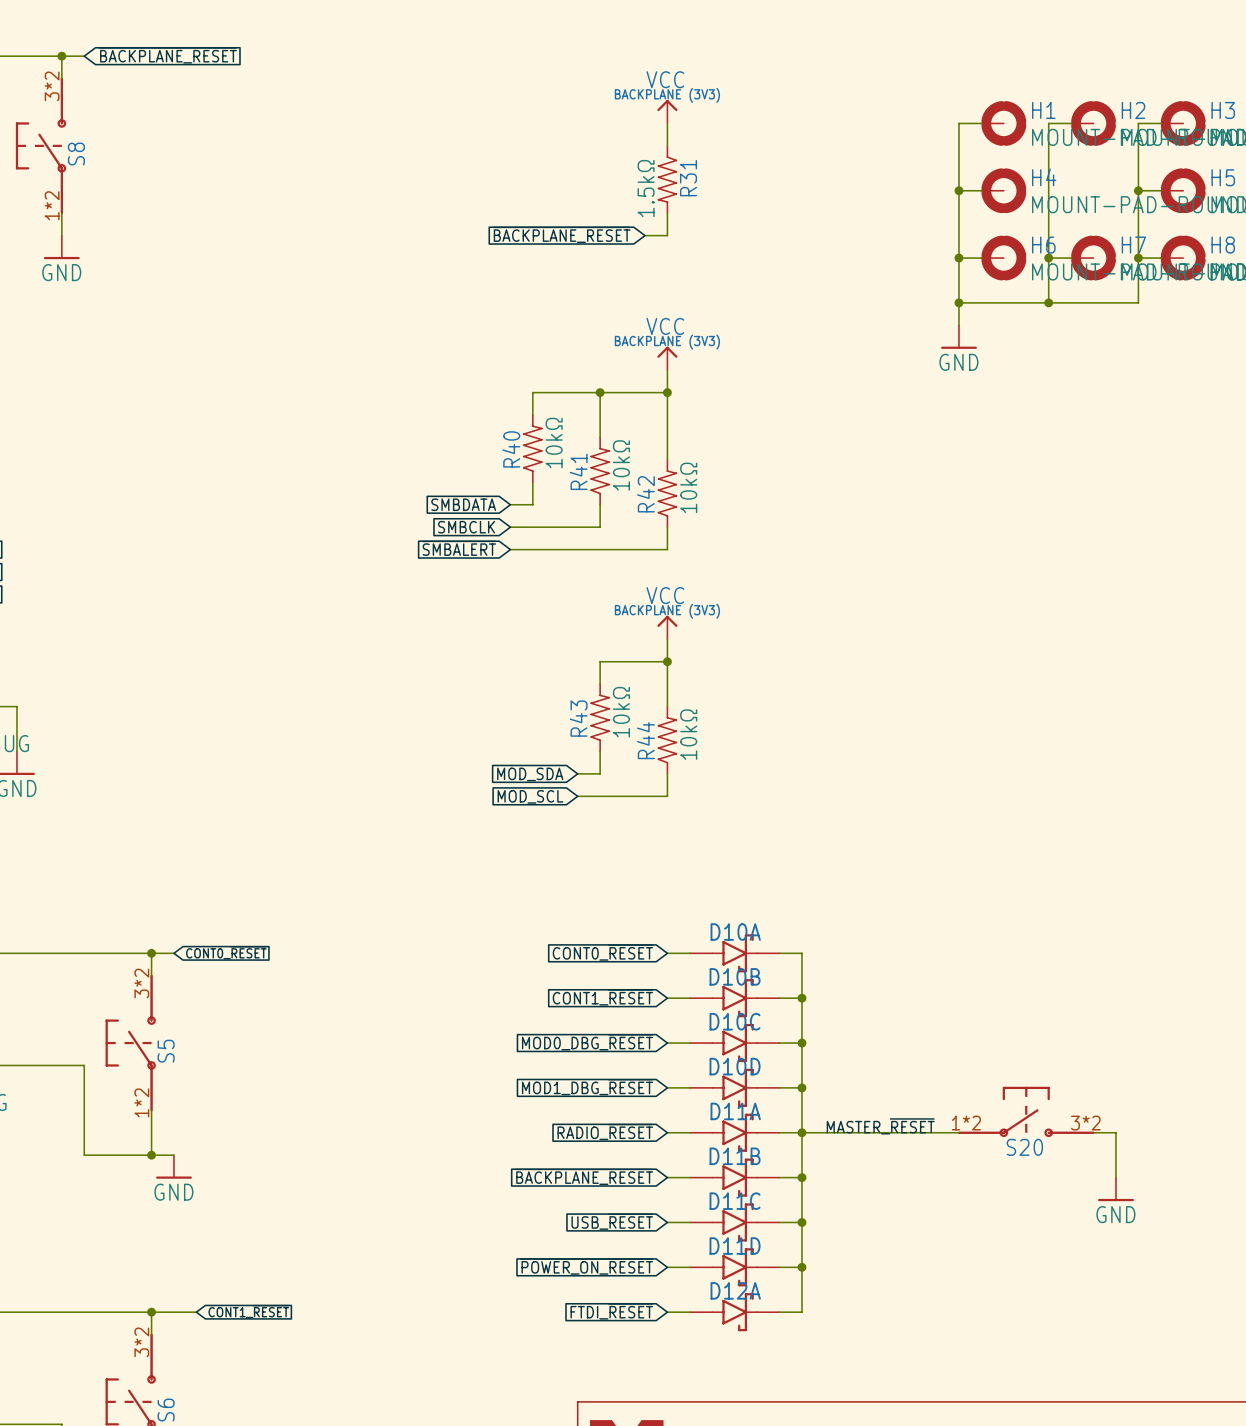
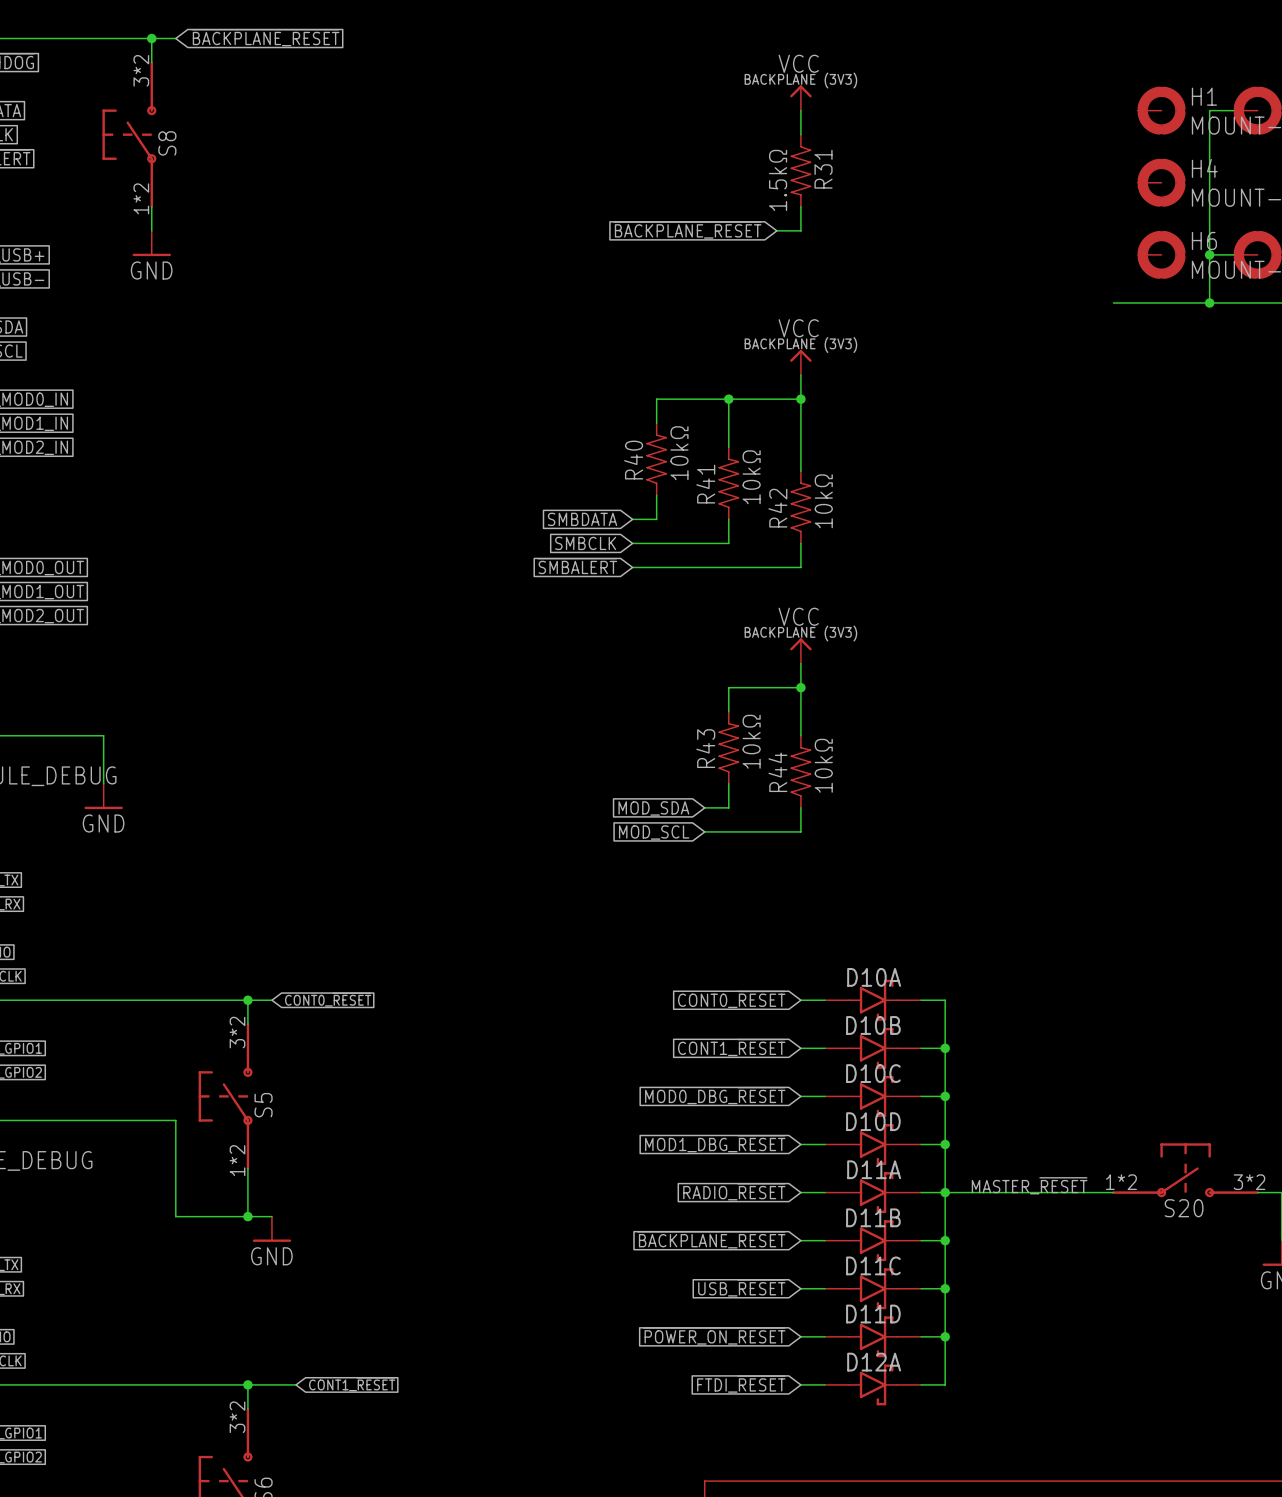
wire: (981, 123) (958, 123) (958, 325) -> none
wire: (958, 190) (981, 190) -> none
junction: (958, 190) -> none
wire: (958, 258) (981, 258) -> none
junction: (958, 258) -> none
junction: (958, 302) -> none
power symbol: GND (958, 337) -> none

